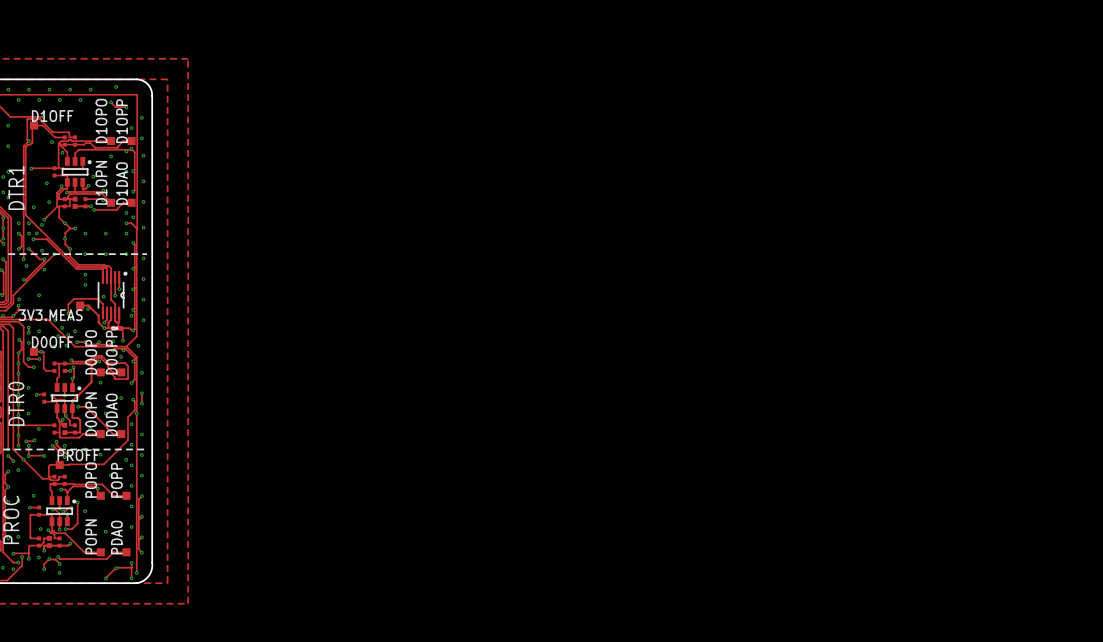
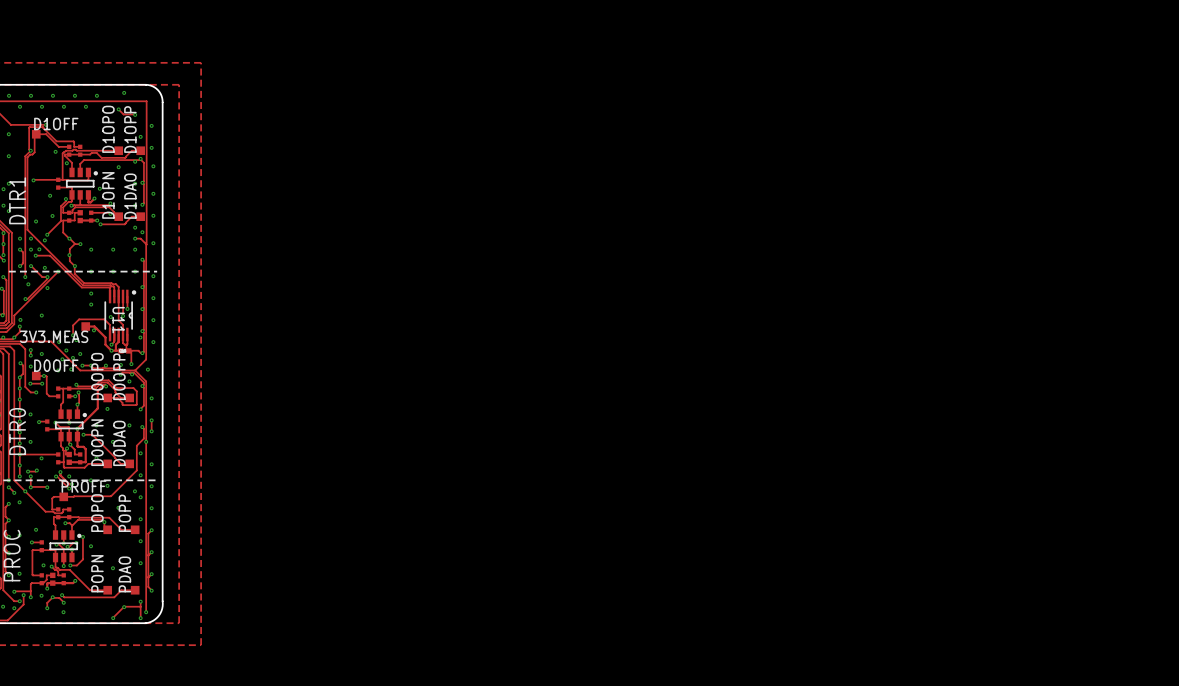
U11 name: none -> U11 (118, 320)

